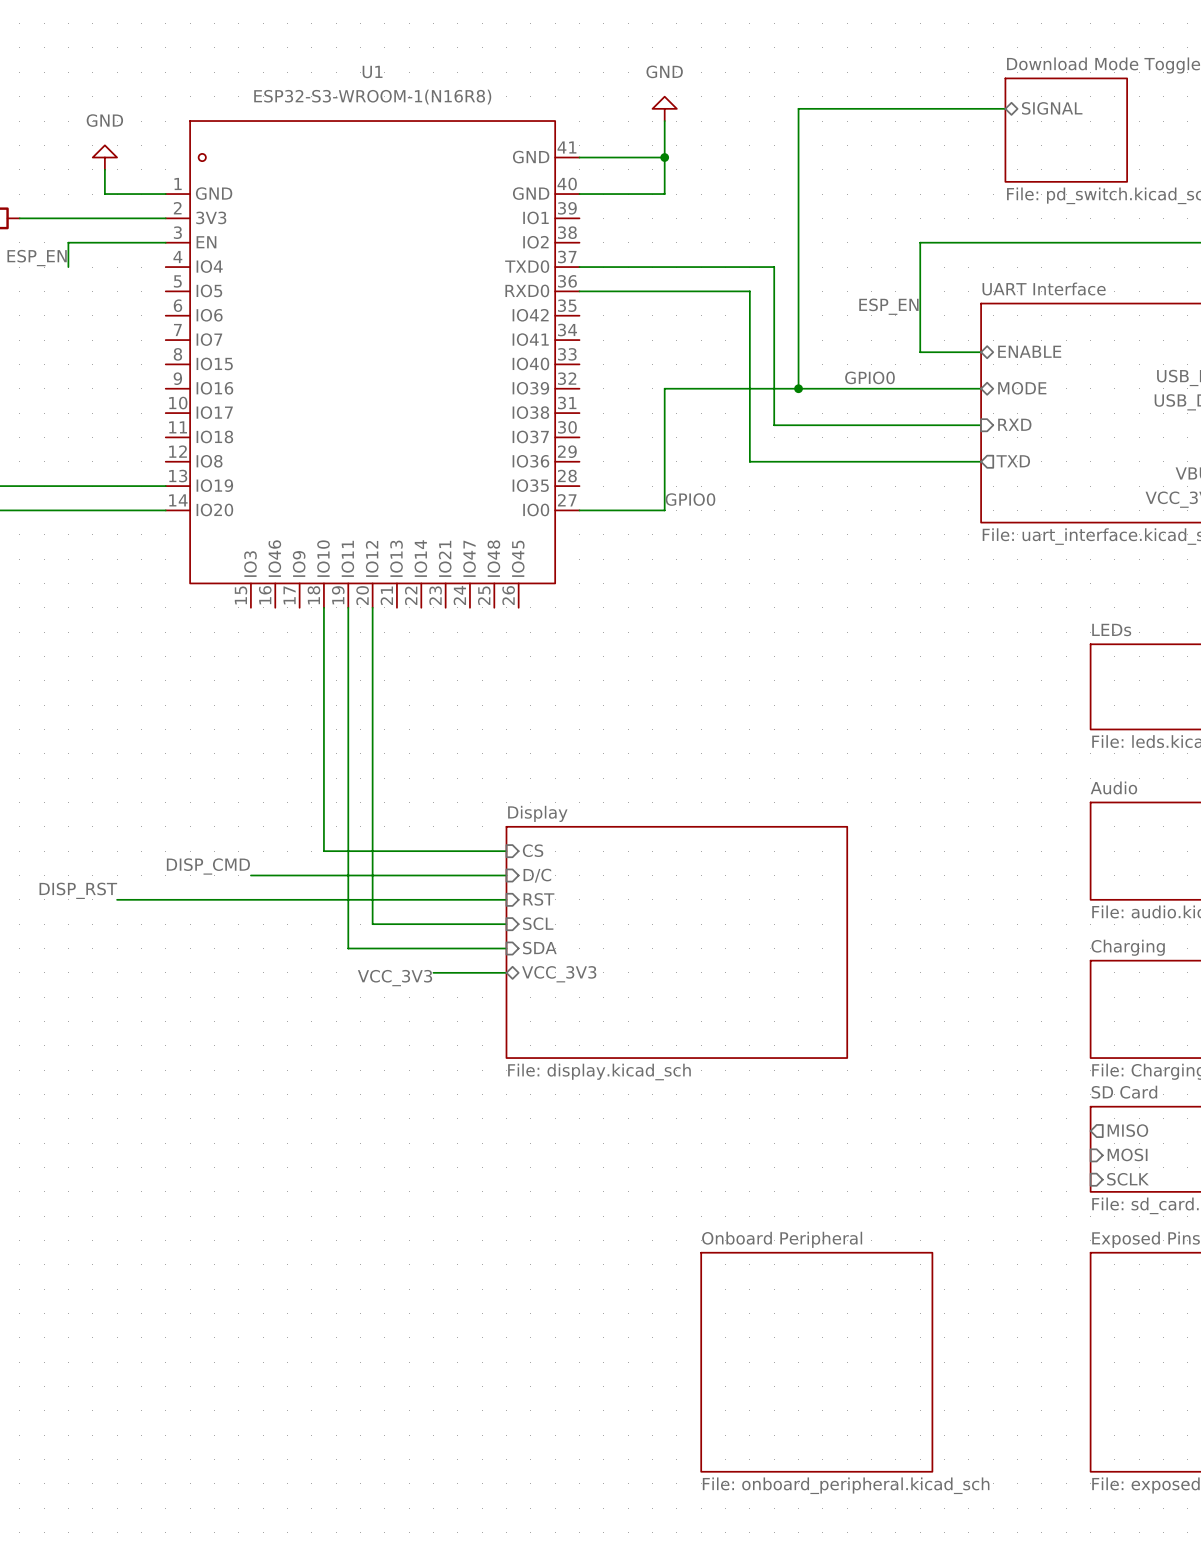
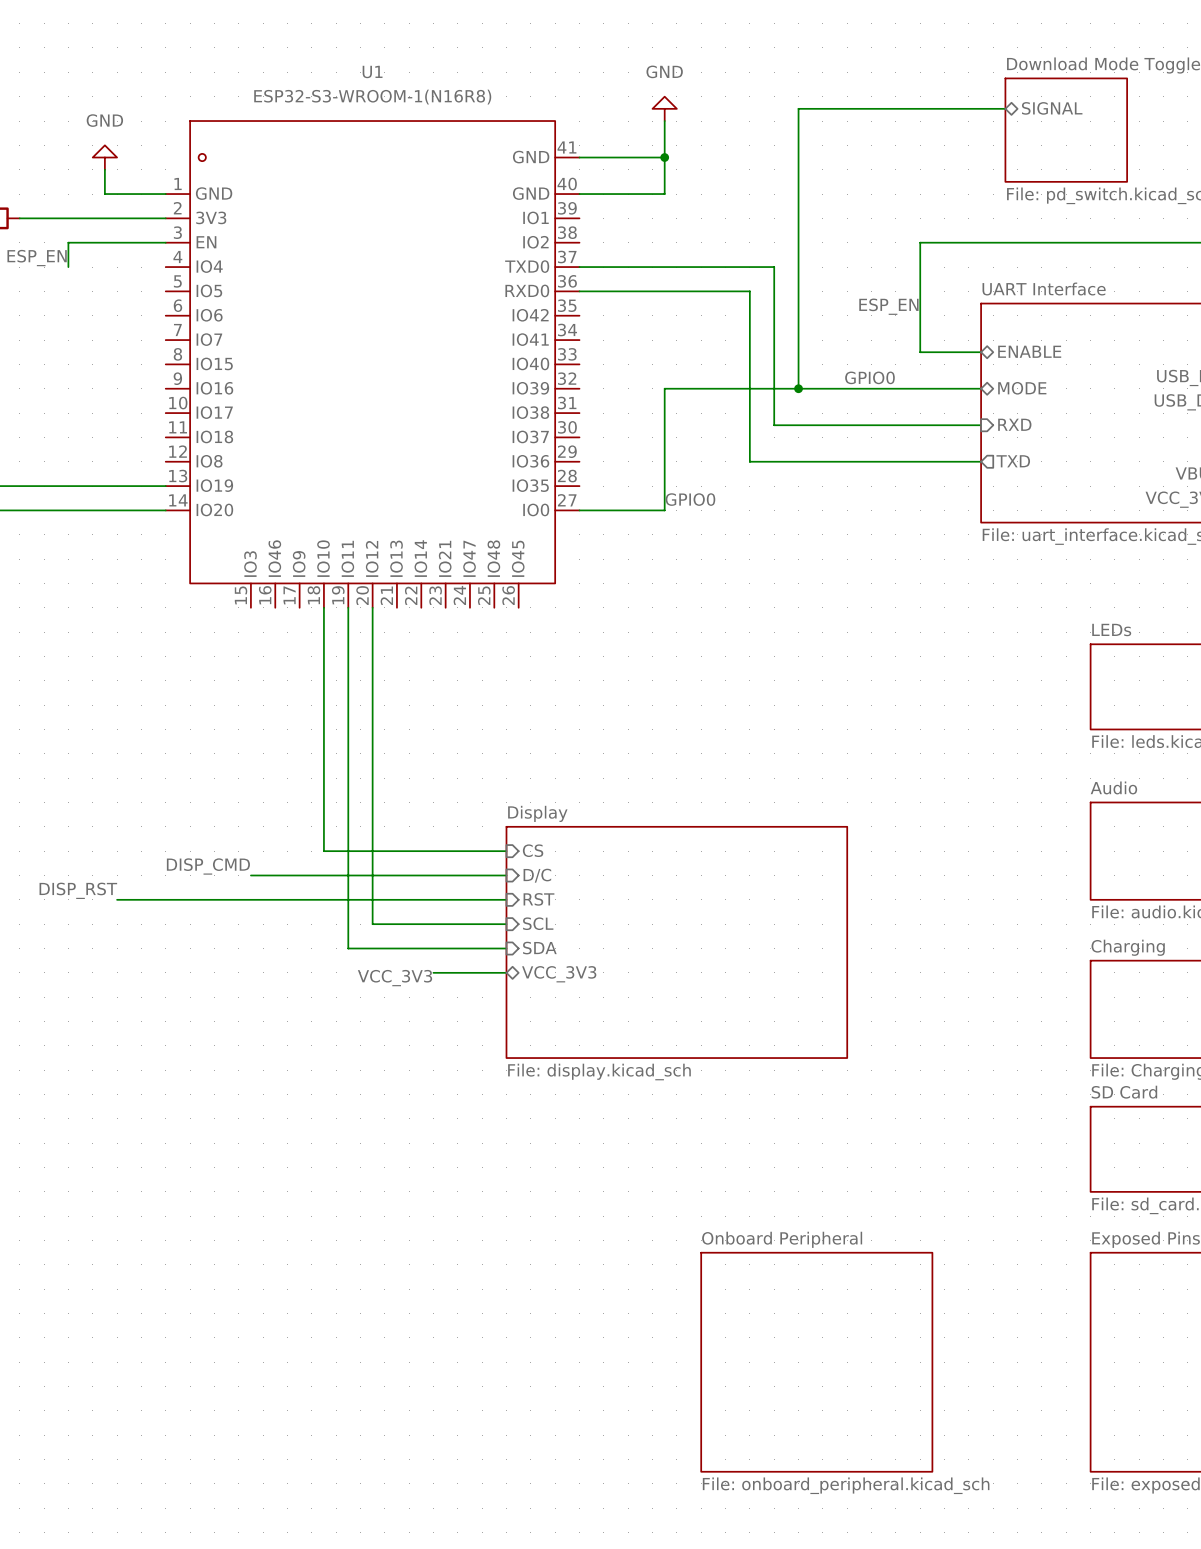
sheet pin: MISO (1127, 1130) -> none
sheet pin: MOSI (1127, 1154) -> none
sheet pin: SCLK (1128, 1179) -> none

